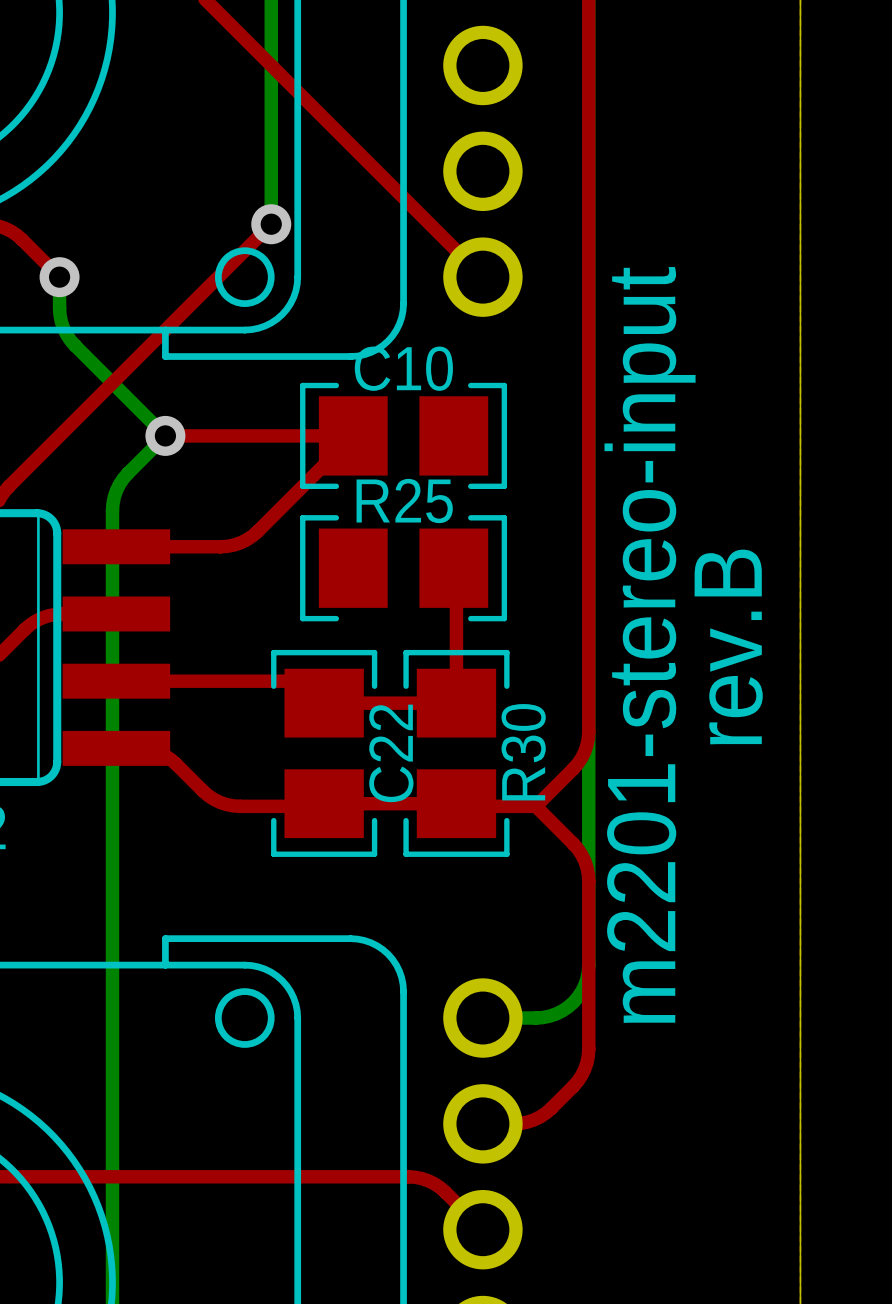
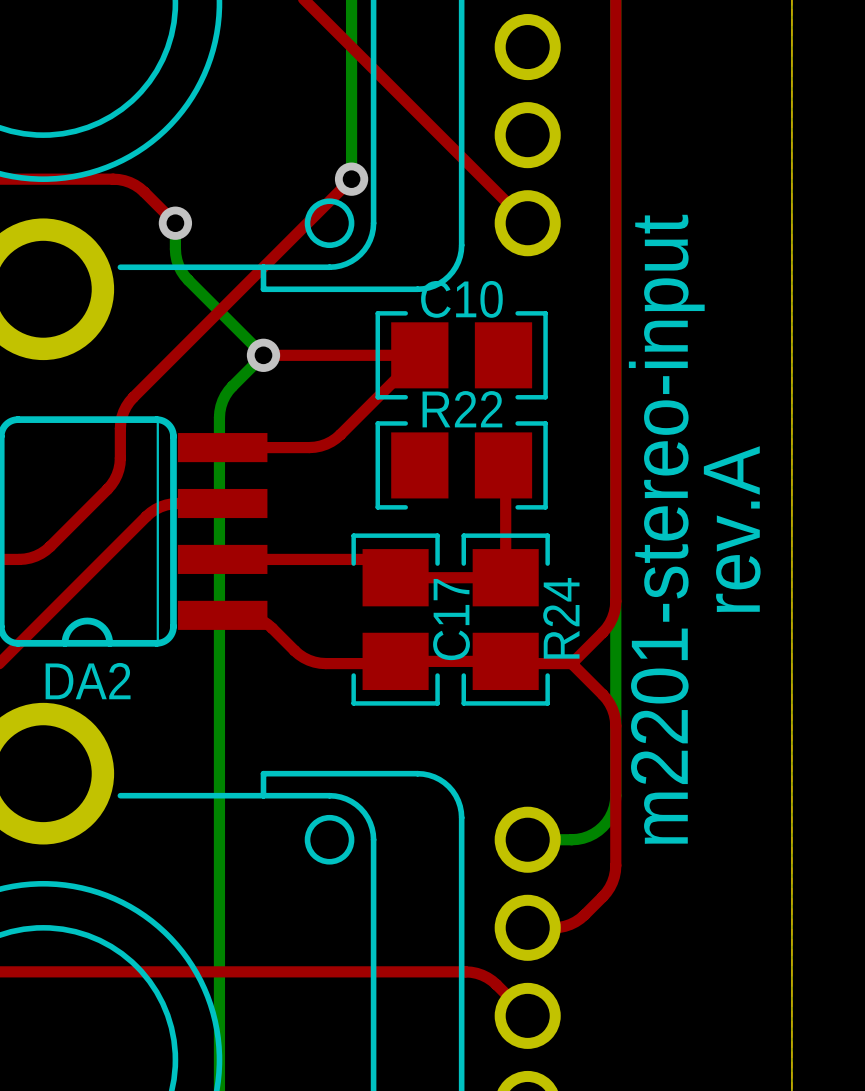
R25 name: R25 (404, 500) -> R22 (462, 409)
part value: rev.B (728, 646) -> rev.A (732, 529)
R30 name: R30 (523, 752) -> R24 (561, 618)
C22 name: C22 (391, 753) -> C17 (451, 619)

